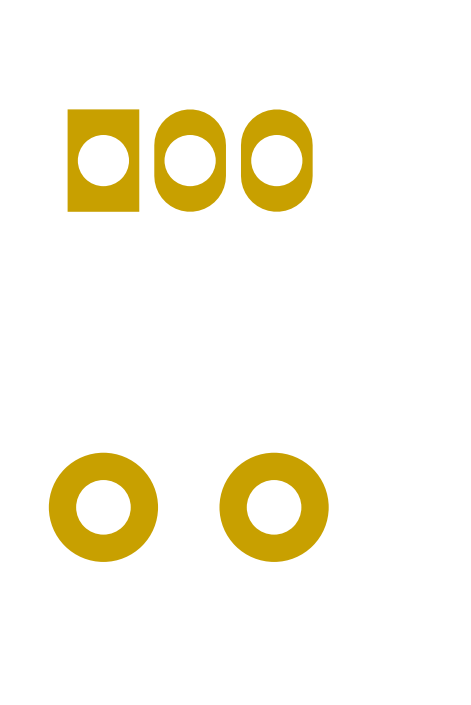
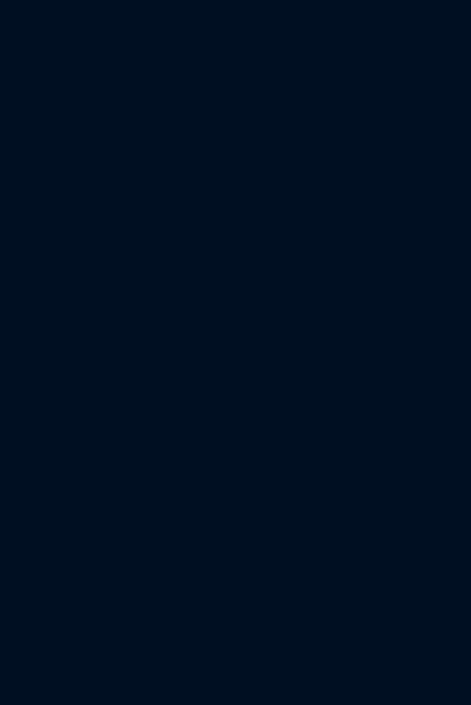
part: (190, 160) -> none
part: (188, 507) -> none

